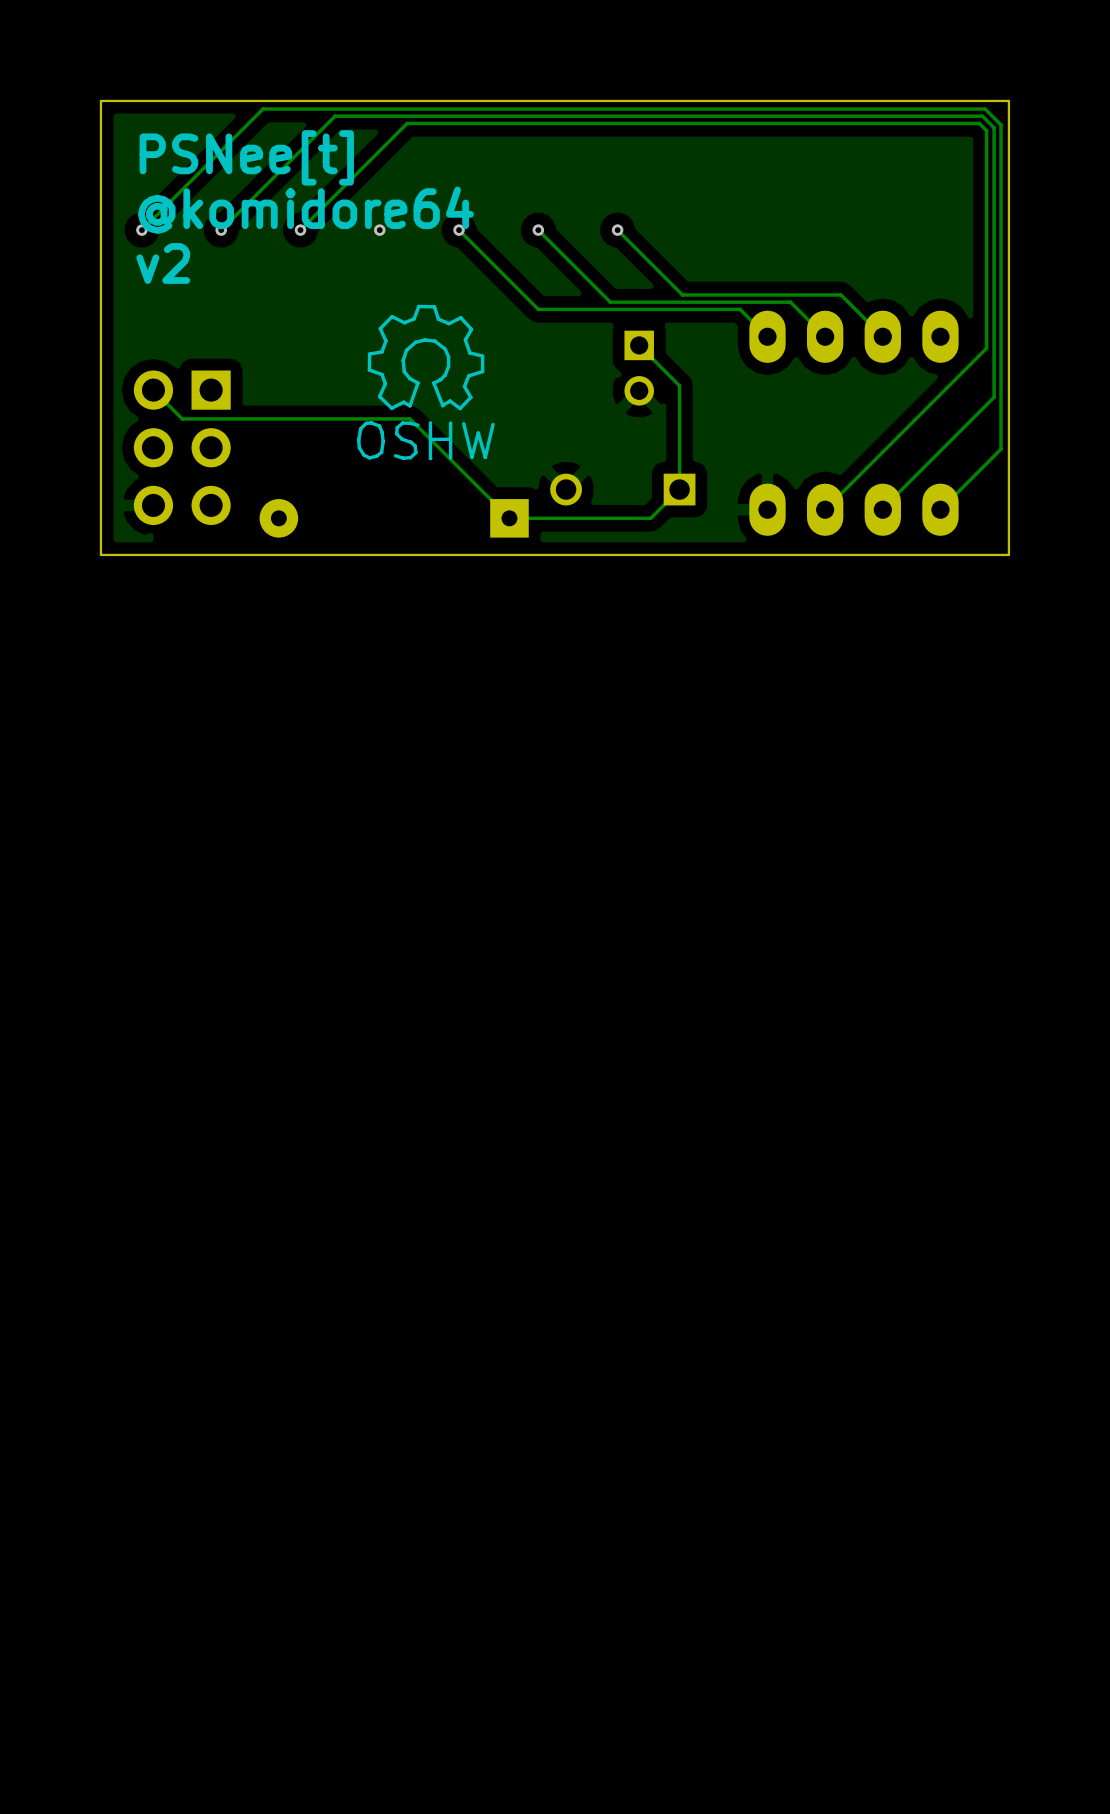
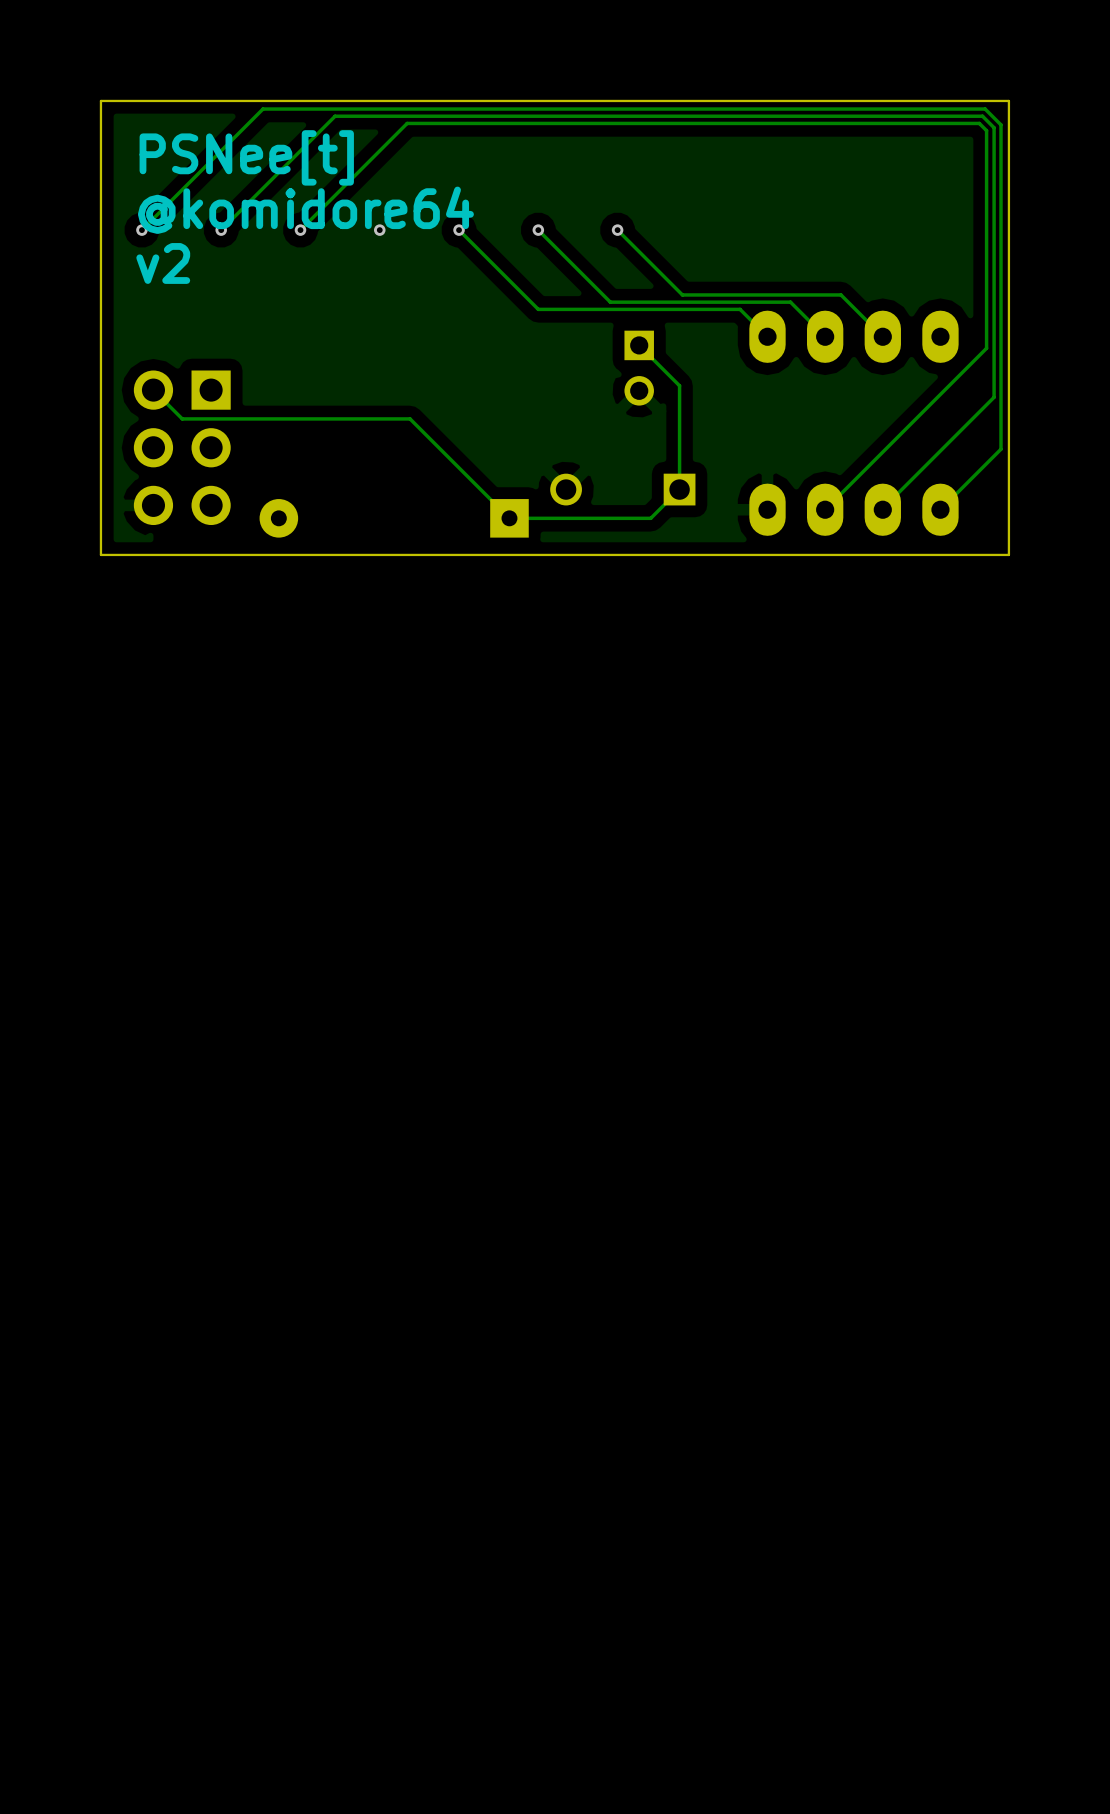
drawing: [357, 304, 495, 461] -> none

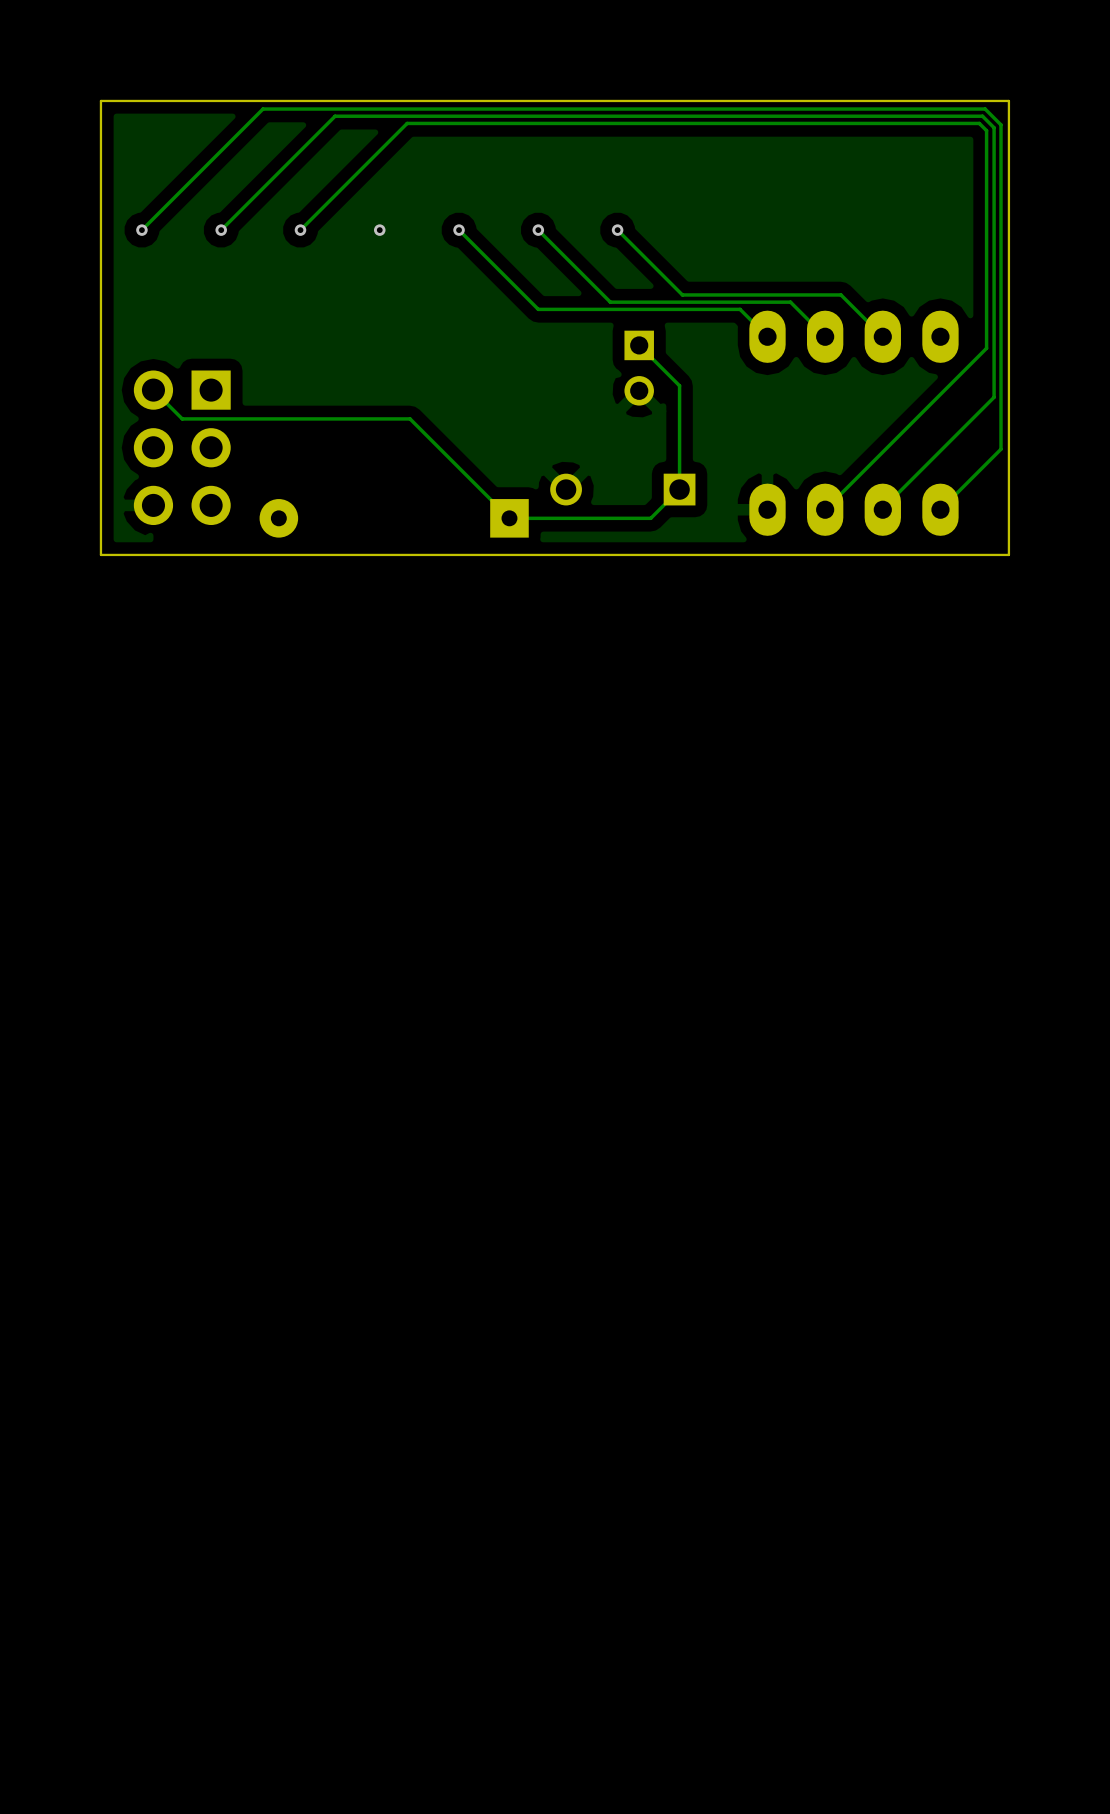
text: PSNee[t] (246, 157) -> none
text: @komidore64 (305, 210) -> none
text: v2 (163, 263) -> none

